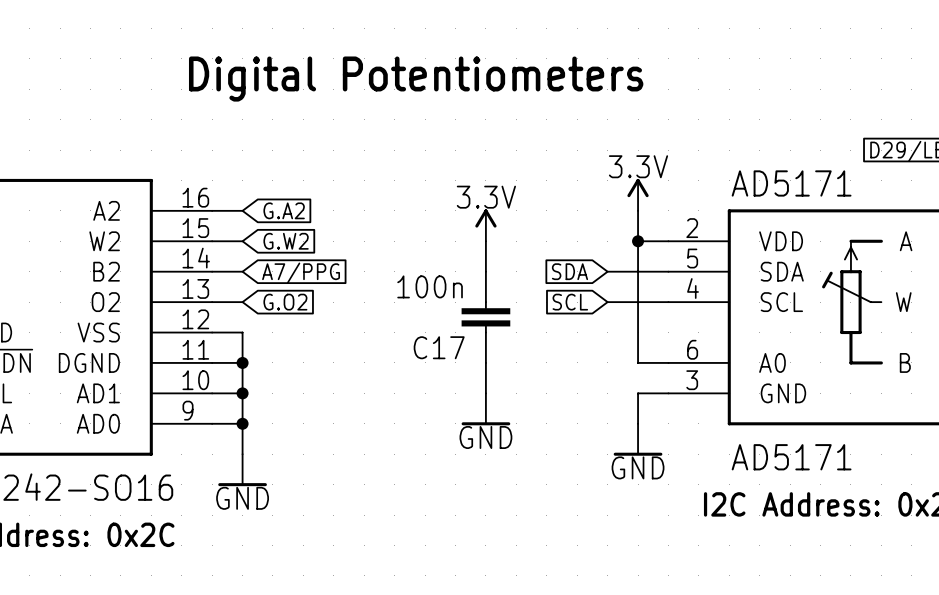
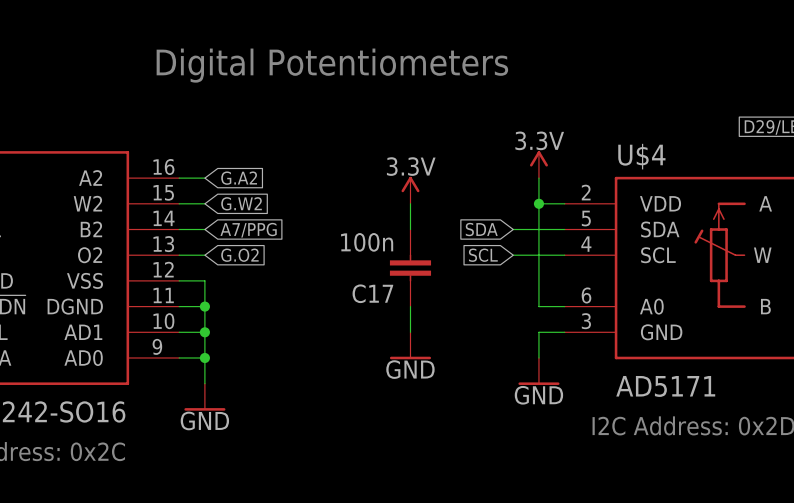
AD5171 name: AD5171 (791, 183) -> U$4 (641, 156)

